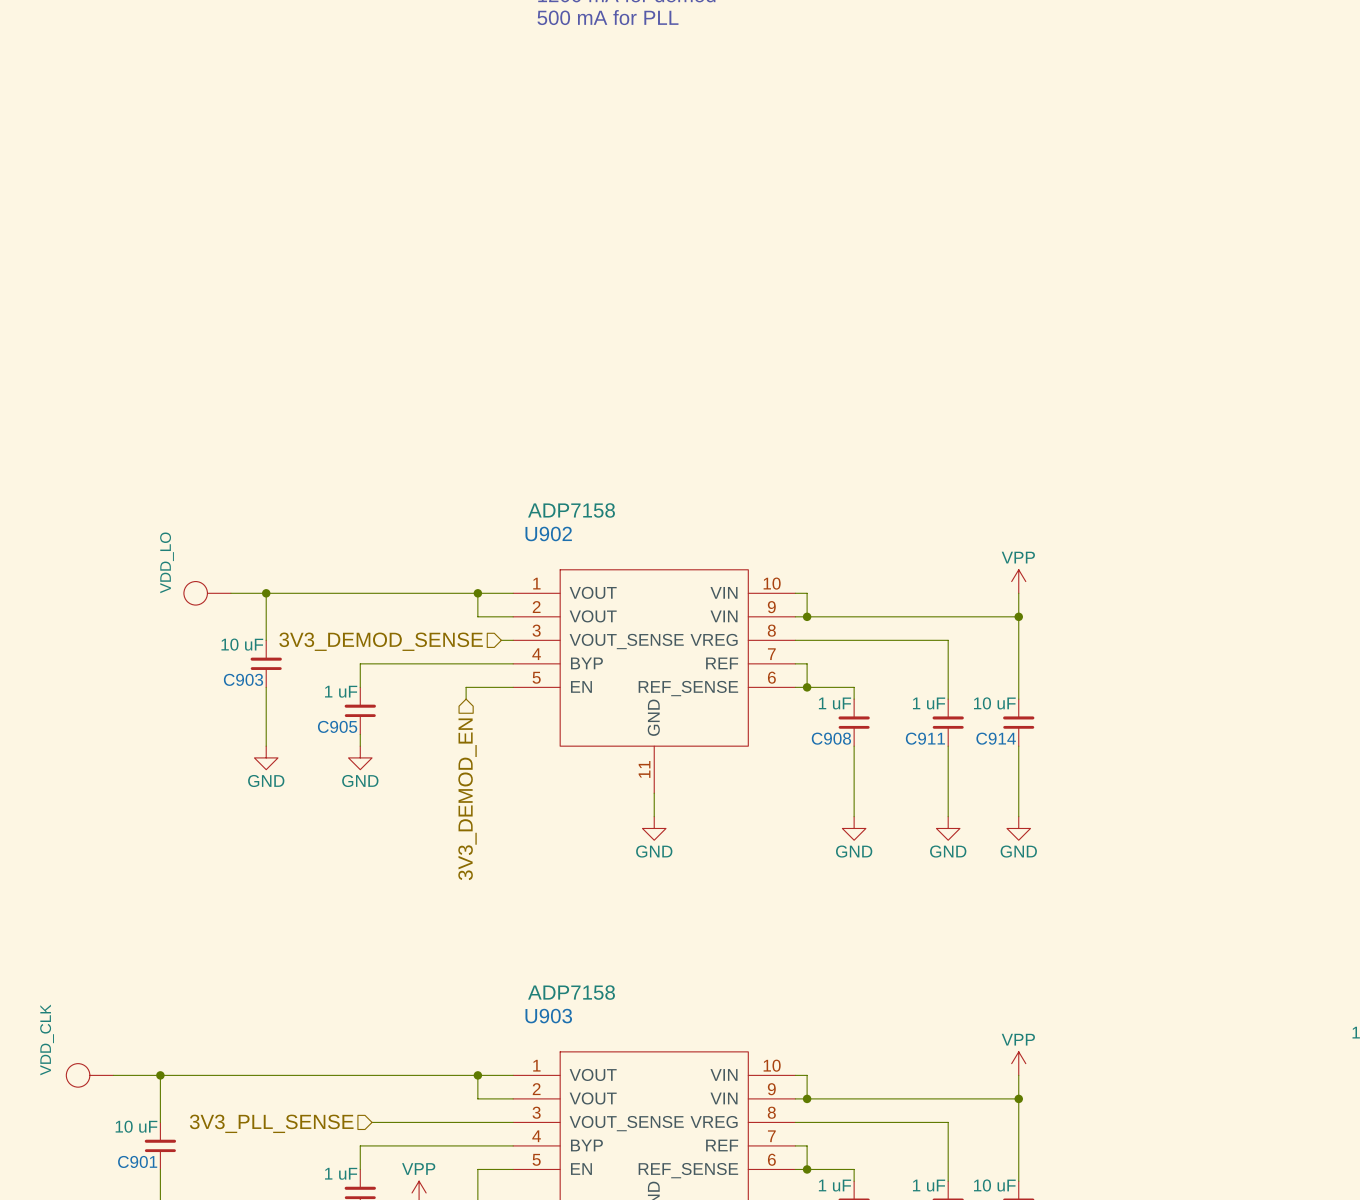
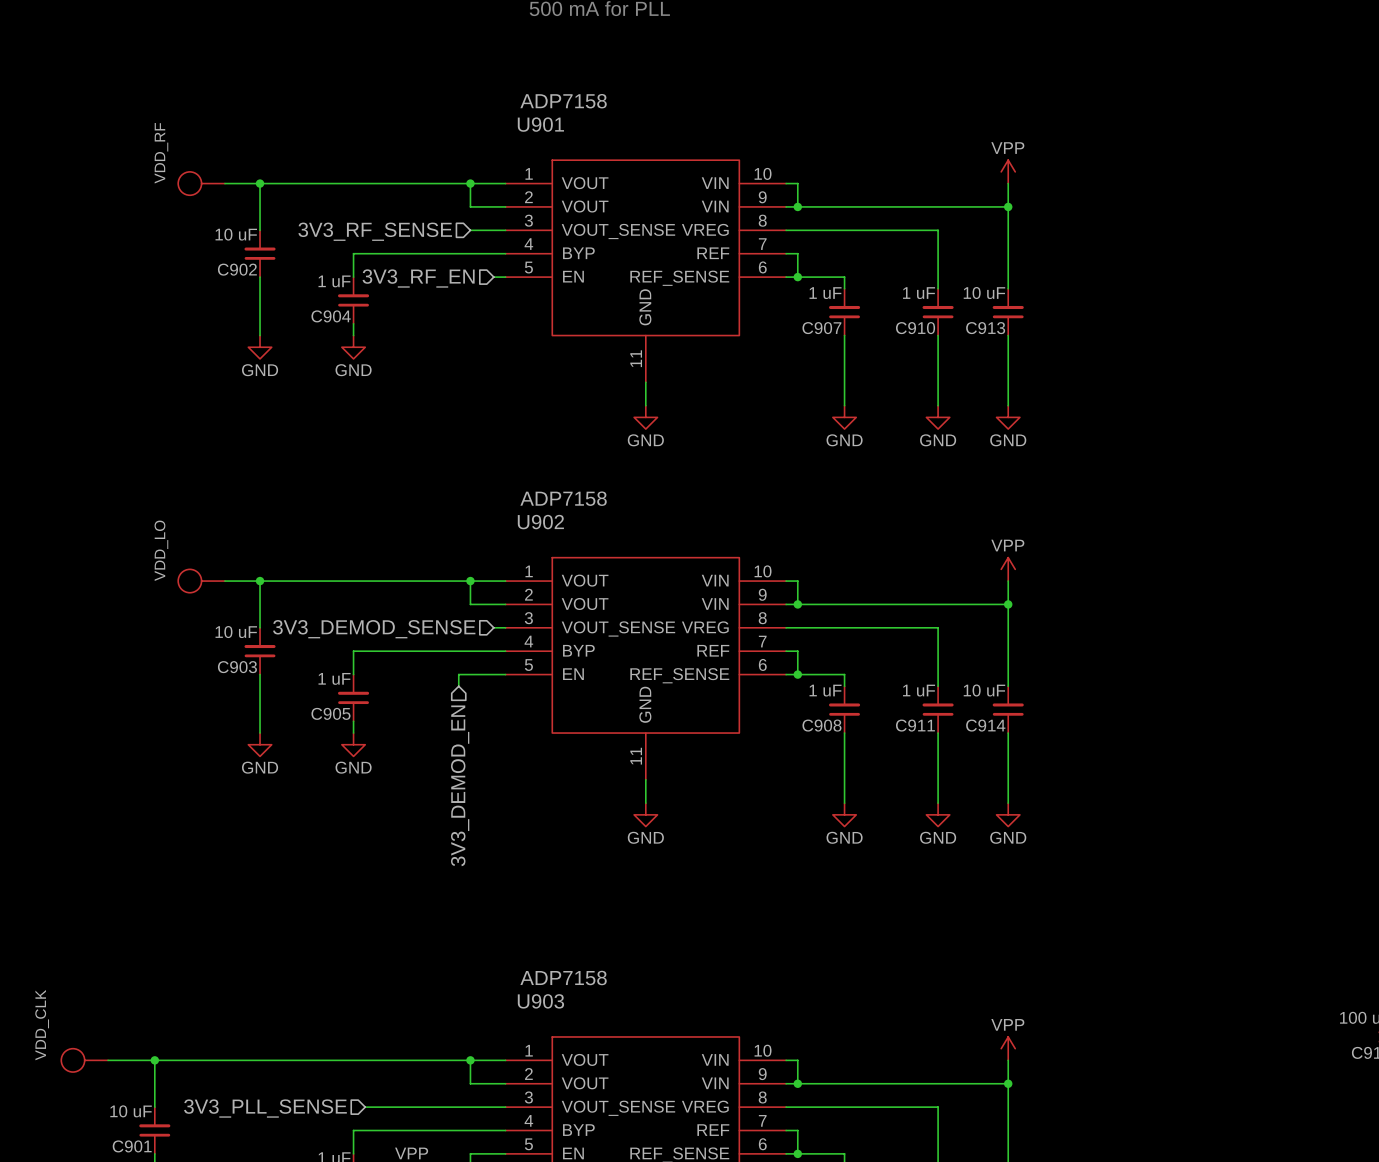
power symbol: none -> VPP (1008, 171)
power symbol: none -> VDD_RF (201, 183)
wire: none -> (224, 183) (505, 183)
wire: none -> (260, 183) (260, 230)
junction: none -> (260, 183)
wire: none -> (470, 183) (470, 206) (505, 206)
junction: none -> (470, 183)
wire: none -> (786, 183) (797, 183) (797, 206)
wire: none -> (1008, 183) (1008, 288)
wire: none -> (786, 206) (1008, 206)
junction: none -> (797, 206)
junction: none -> (1008, 206)
wire: none -> (470, 230) (505, 230)
wire: none -> (786, 230) (938, 230) (938, 288)
hierarchical label: none -> 3V3_RF_SENSE (375, 231)
C902: none -> 10 uF (260, 253)
wire: none -> (505, 253) (353, 253) (353, 277)
wire: none -> (786, 253) (797, 253) (797, 277)
U901: none -> ADP7158 (645, 271)
wire: none -> (260, 277) (260, 335)
wire: none -> (493, 277) (505, 277)
wire: none -> (786, 277) (844, 277) (844, 288)
junction: none -> (797, 277)
hierarchical label: none -> 3V3_RF_EN (418, 278)
C904: none -> 1 uF (353, 300)
C907: none -> 1 uF (844, 312)
C910: none -> 1 uF (938, 312)
C913: none -> 10 uF (1008, 312)
wire: none -> (353, 323) (353, 335)
wire: none -> (844, 335) (844, 405)
wire: none -> (938, 335) (938, 405)
wire: none -> (1008, 335) (1008, 405)
power symbol: none -> GND (260, 347)
power symbol: none -> GND (353, 347)
wire: none -> (645, 382) (645, 405)
power symbol: none -> GND (645, 417)
power symbol: none -> GND (844, 417)
power symbol: none -> GND (938, 417)
power symbol: none -> GND (1008, 417)

